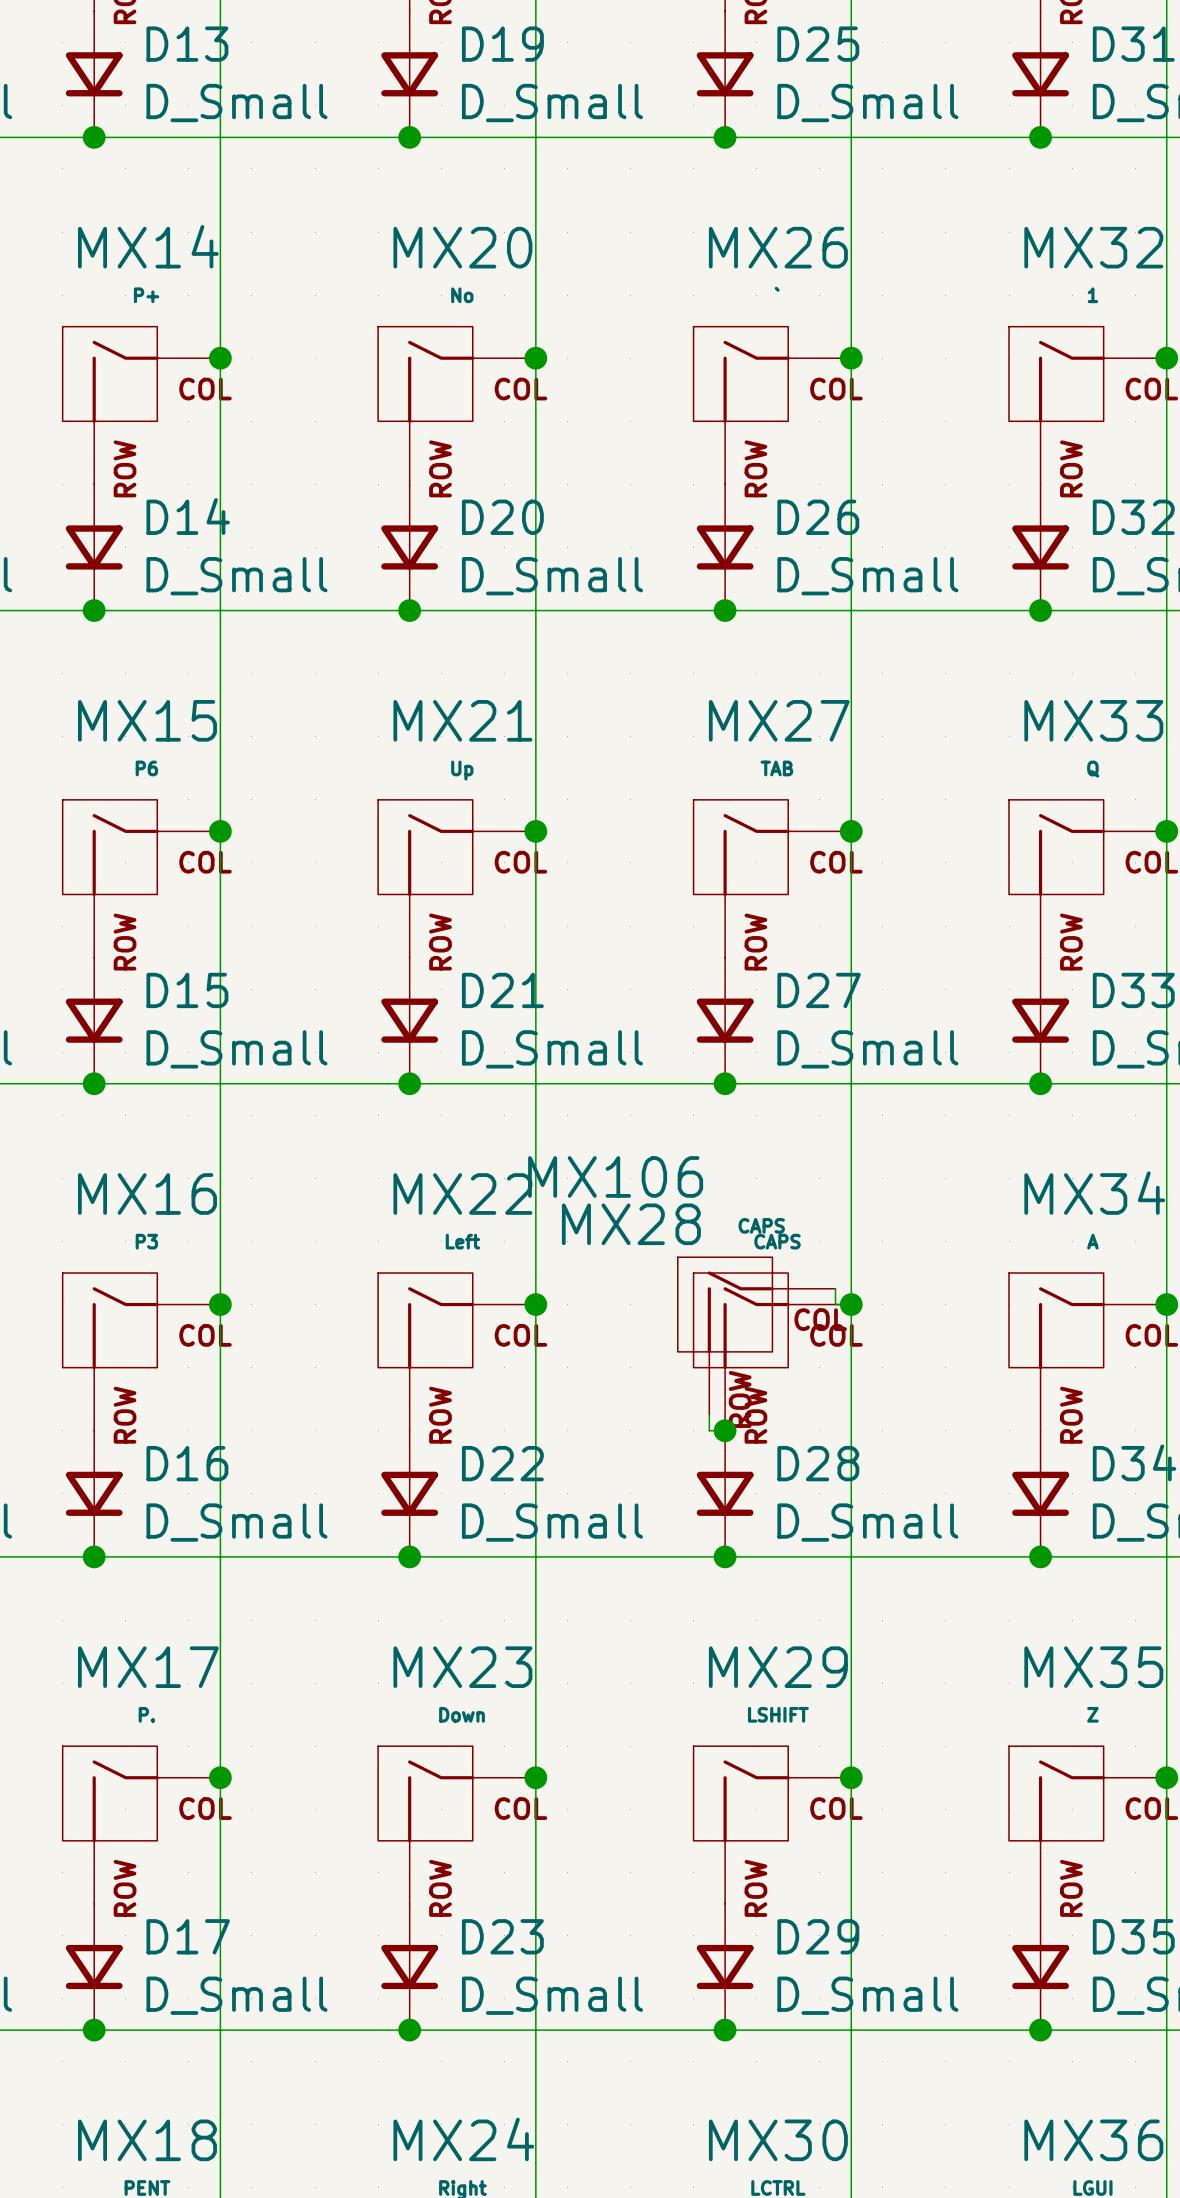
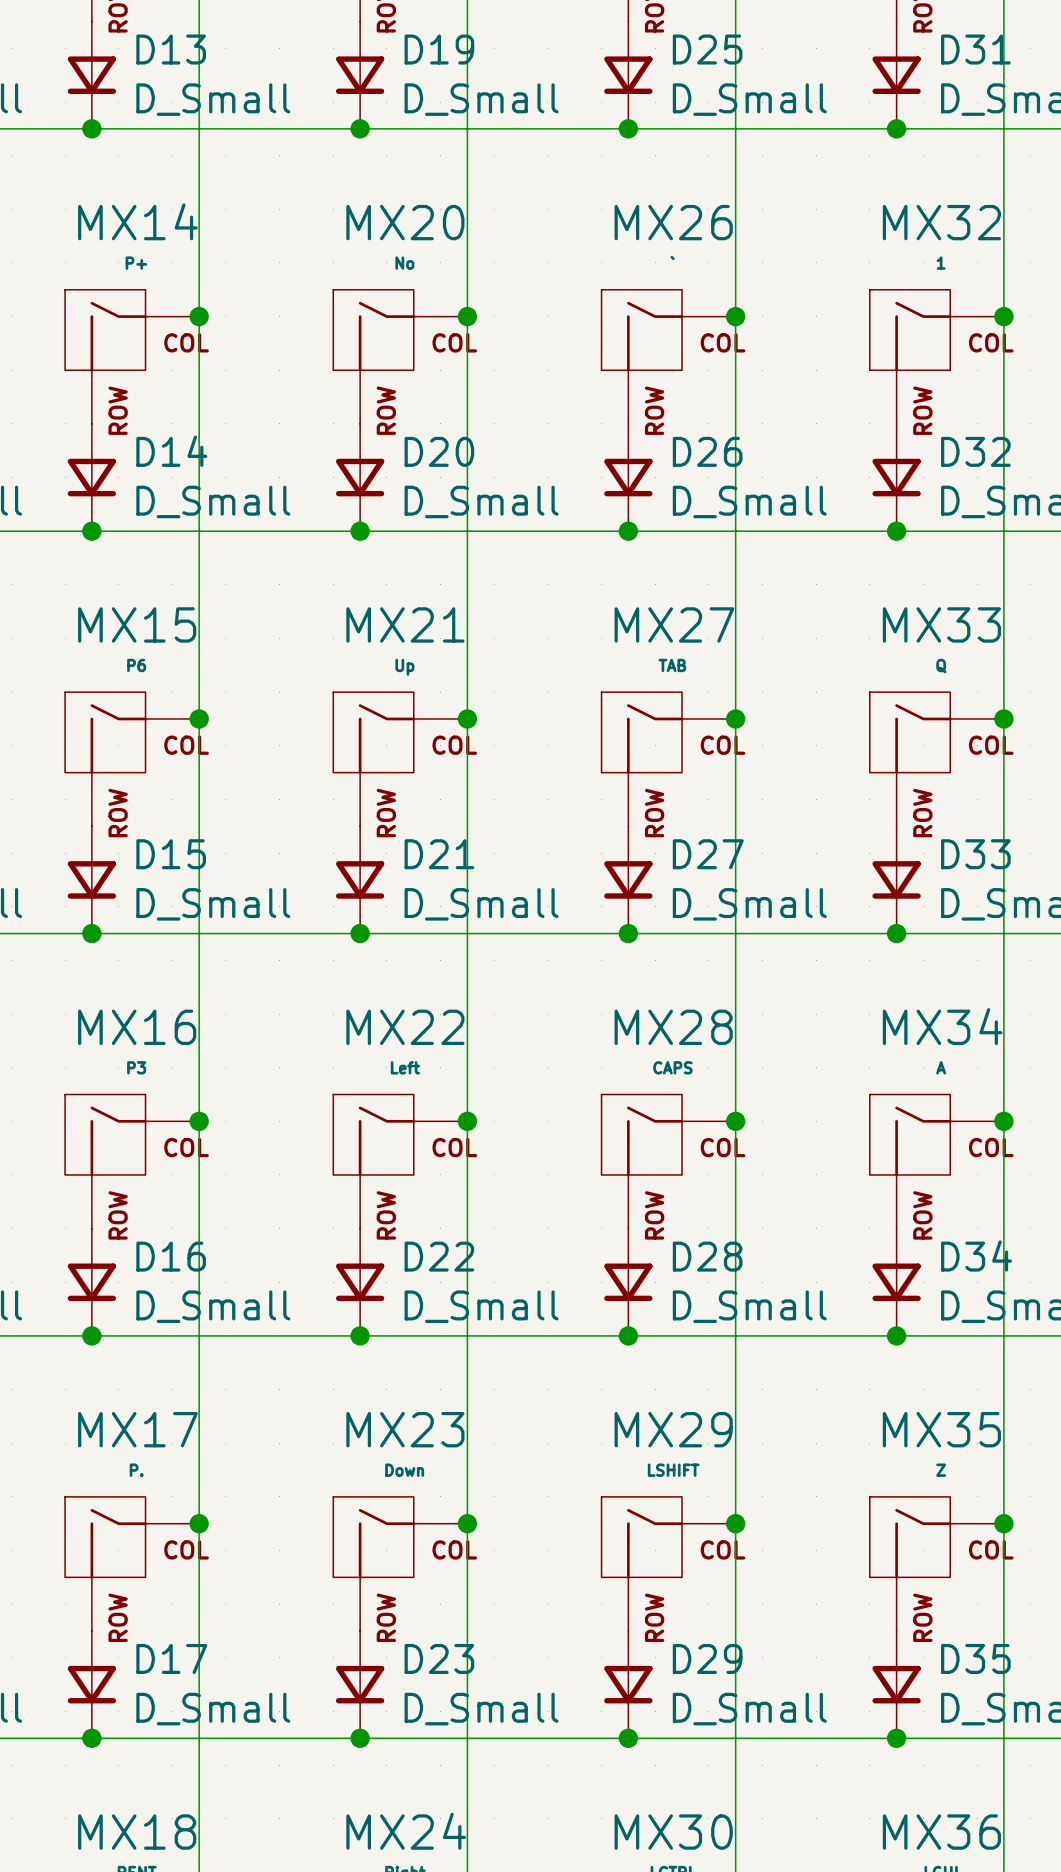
MX28 name position: MX28 (631, 1224) -> MX28 (673, 1027)
wire: (835, 1288) (835, 1304) (851, 1304) -> none
MX106: CAPS (756, 1336) -> none
wire: (709, 1414) (709, 1430) (725, 1430) -> none
junction: (725, 1430) -> none

